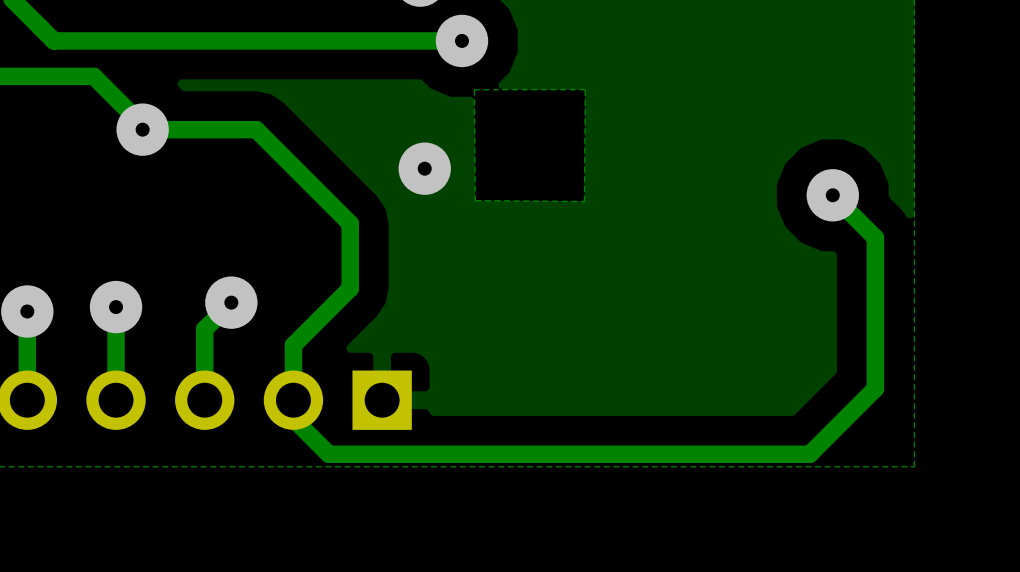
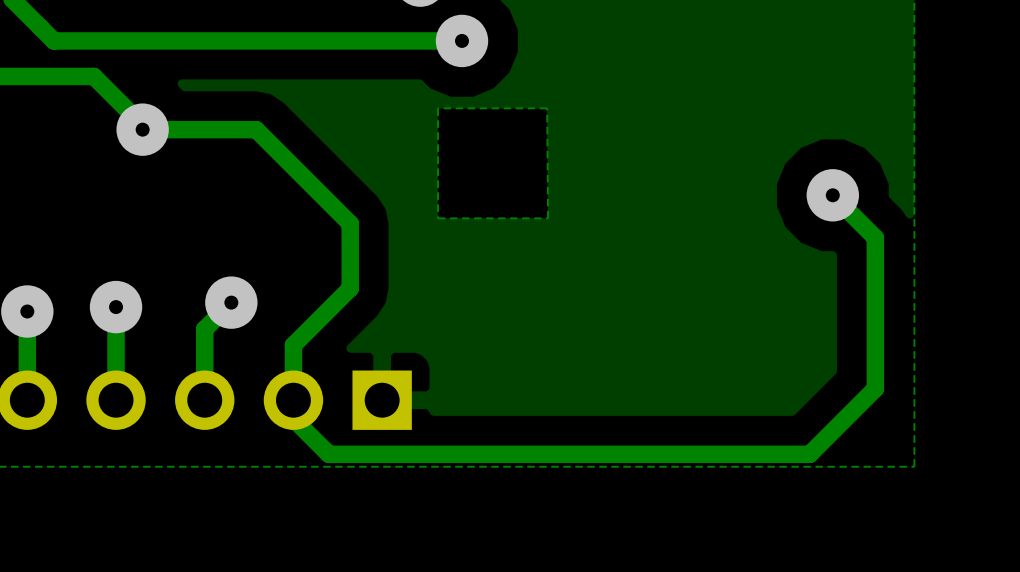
zone outline: (585, 89) (474, 89) (475, 200) (584, 201) (585, 89) -> none
zone outline: none -> (547, 108) (438, 108) (438, 218) (548, 218) (547, 108)
via: (424, 168) -> none

